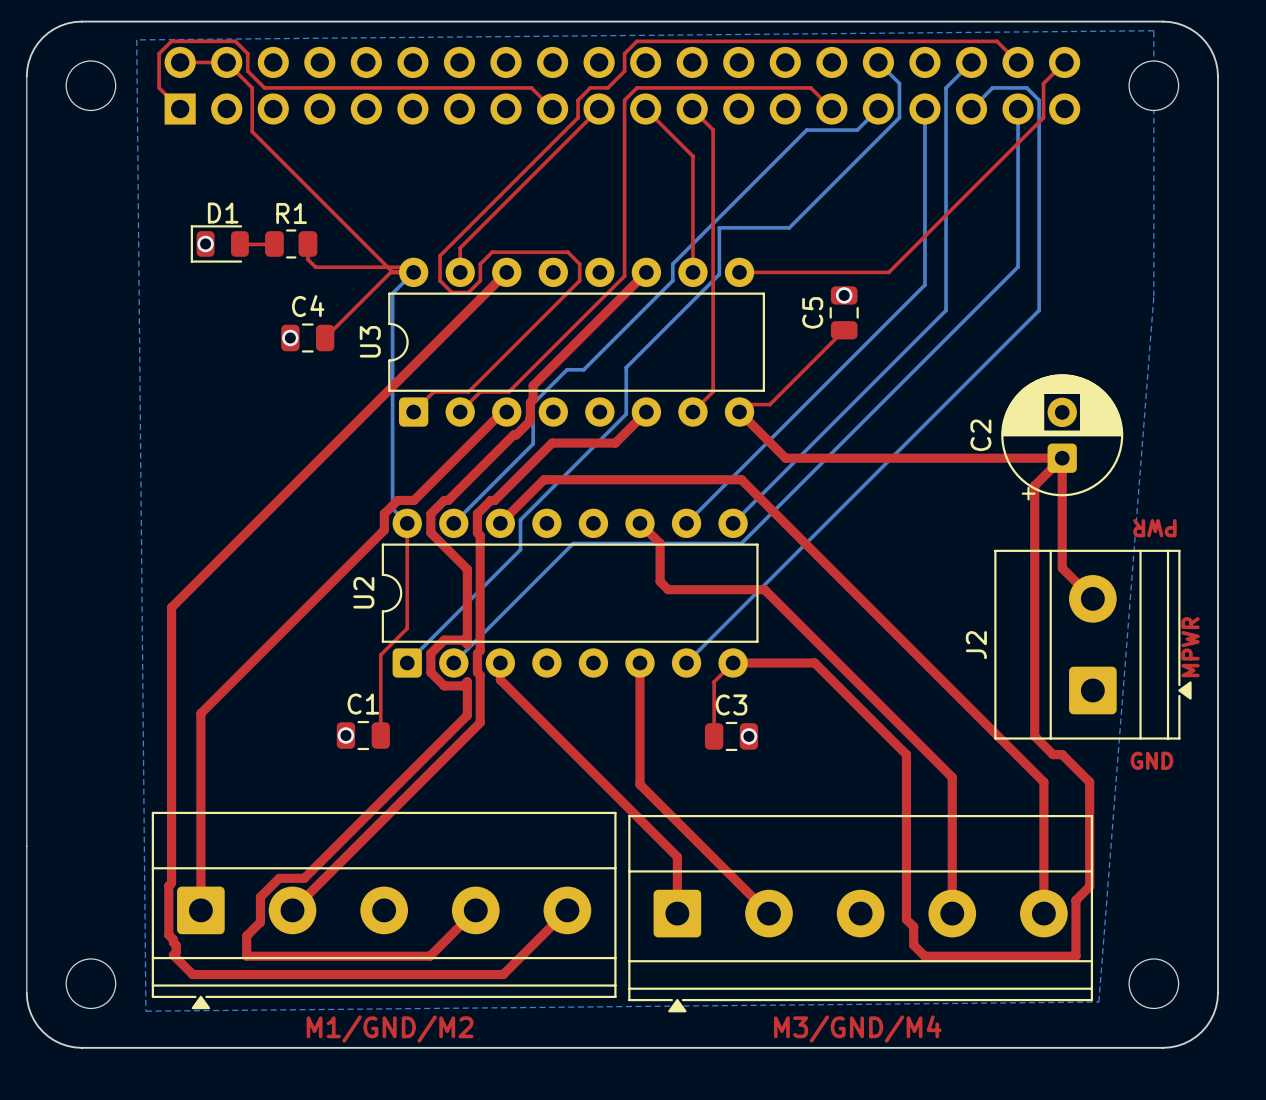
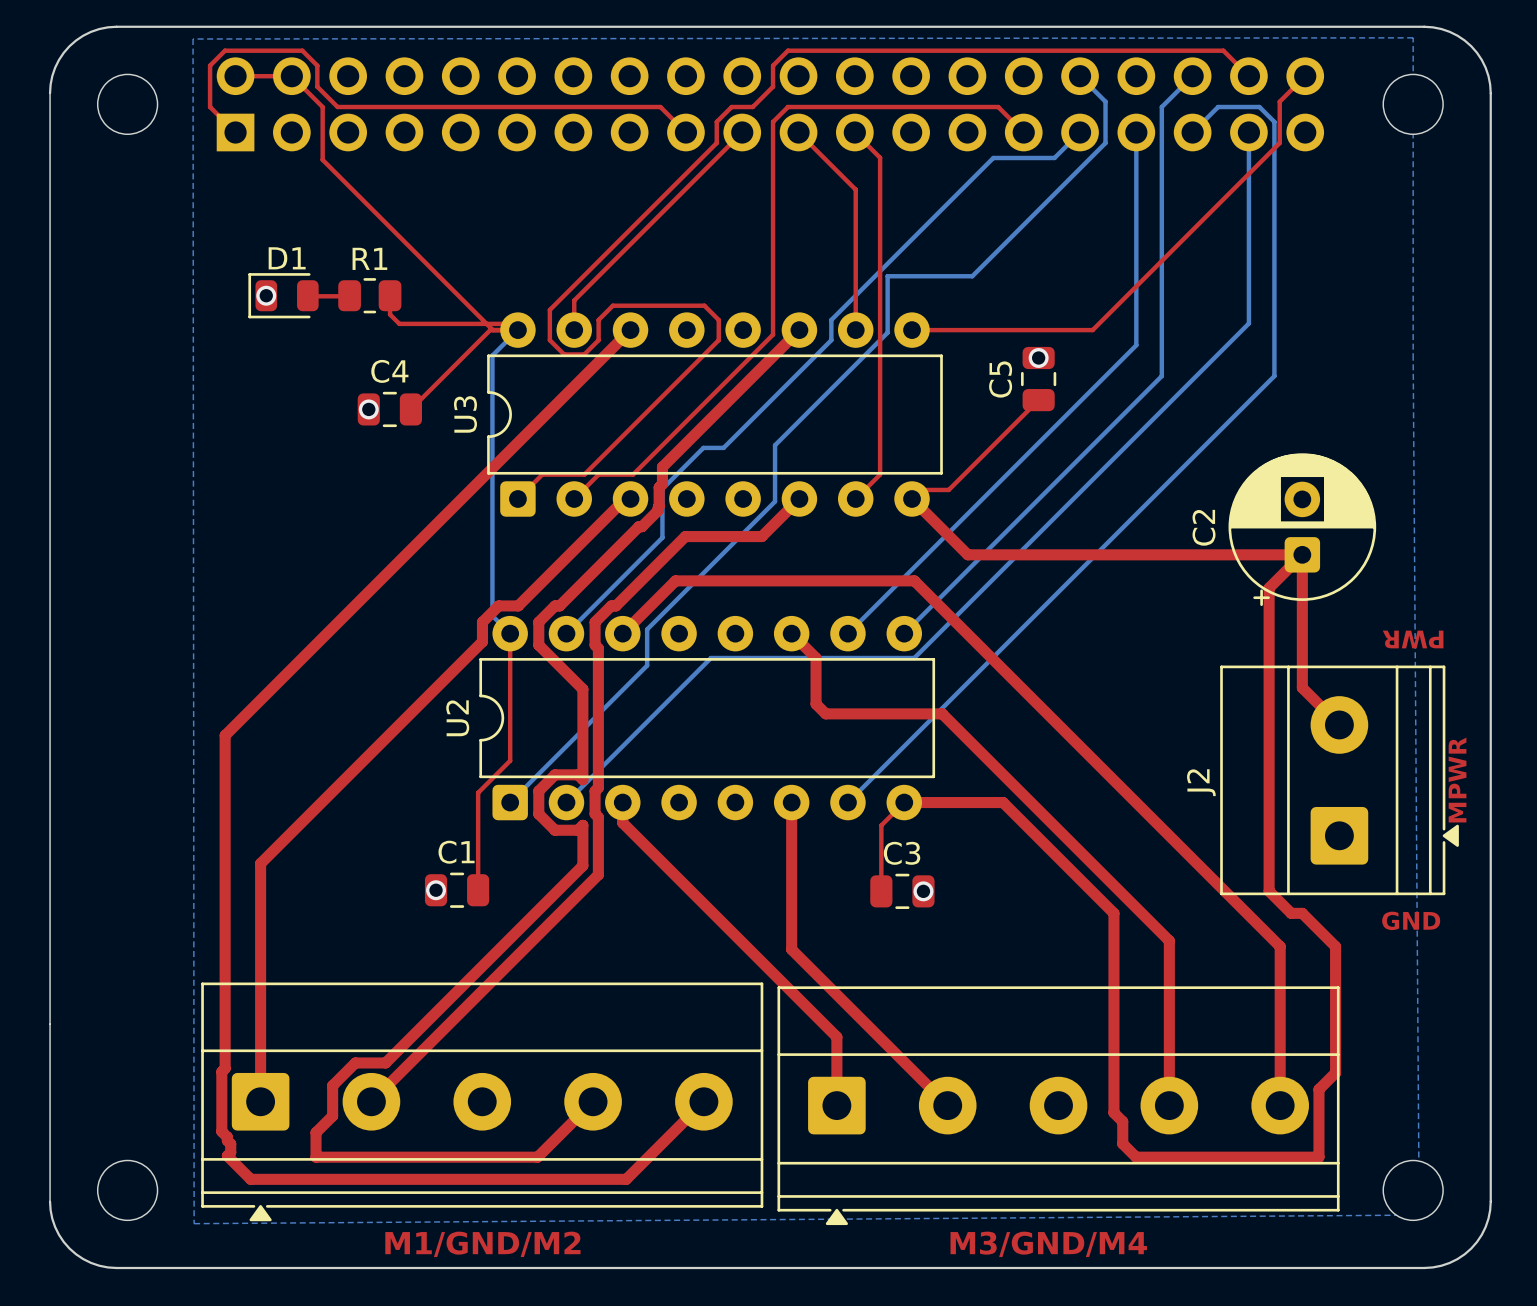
bottom zone outline: (1153, 30) (136, 39) (145, 1011) (1098, 1002) (1153, 296) -> (1413, 37) (193, 39) (194, 1223) (1419, 1215) (1413, 359)

